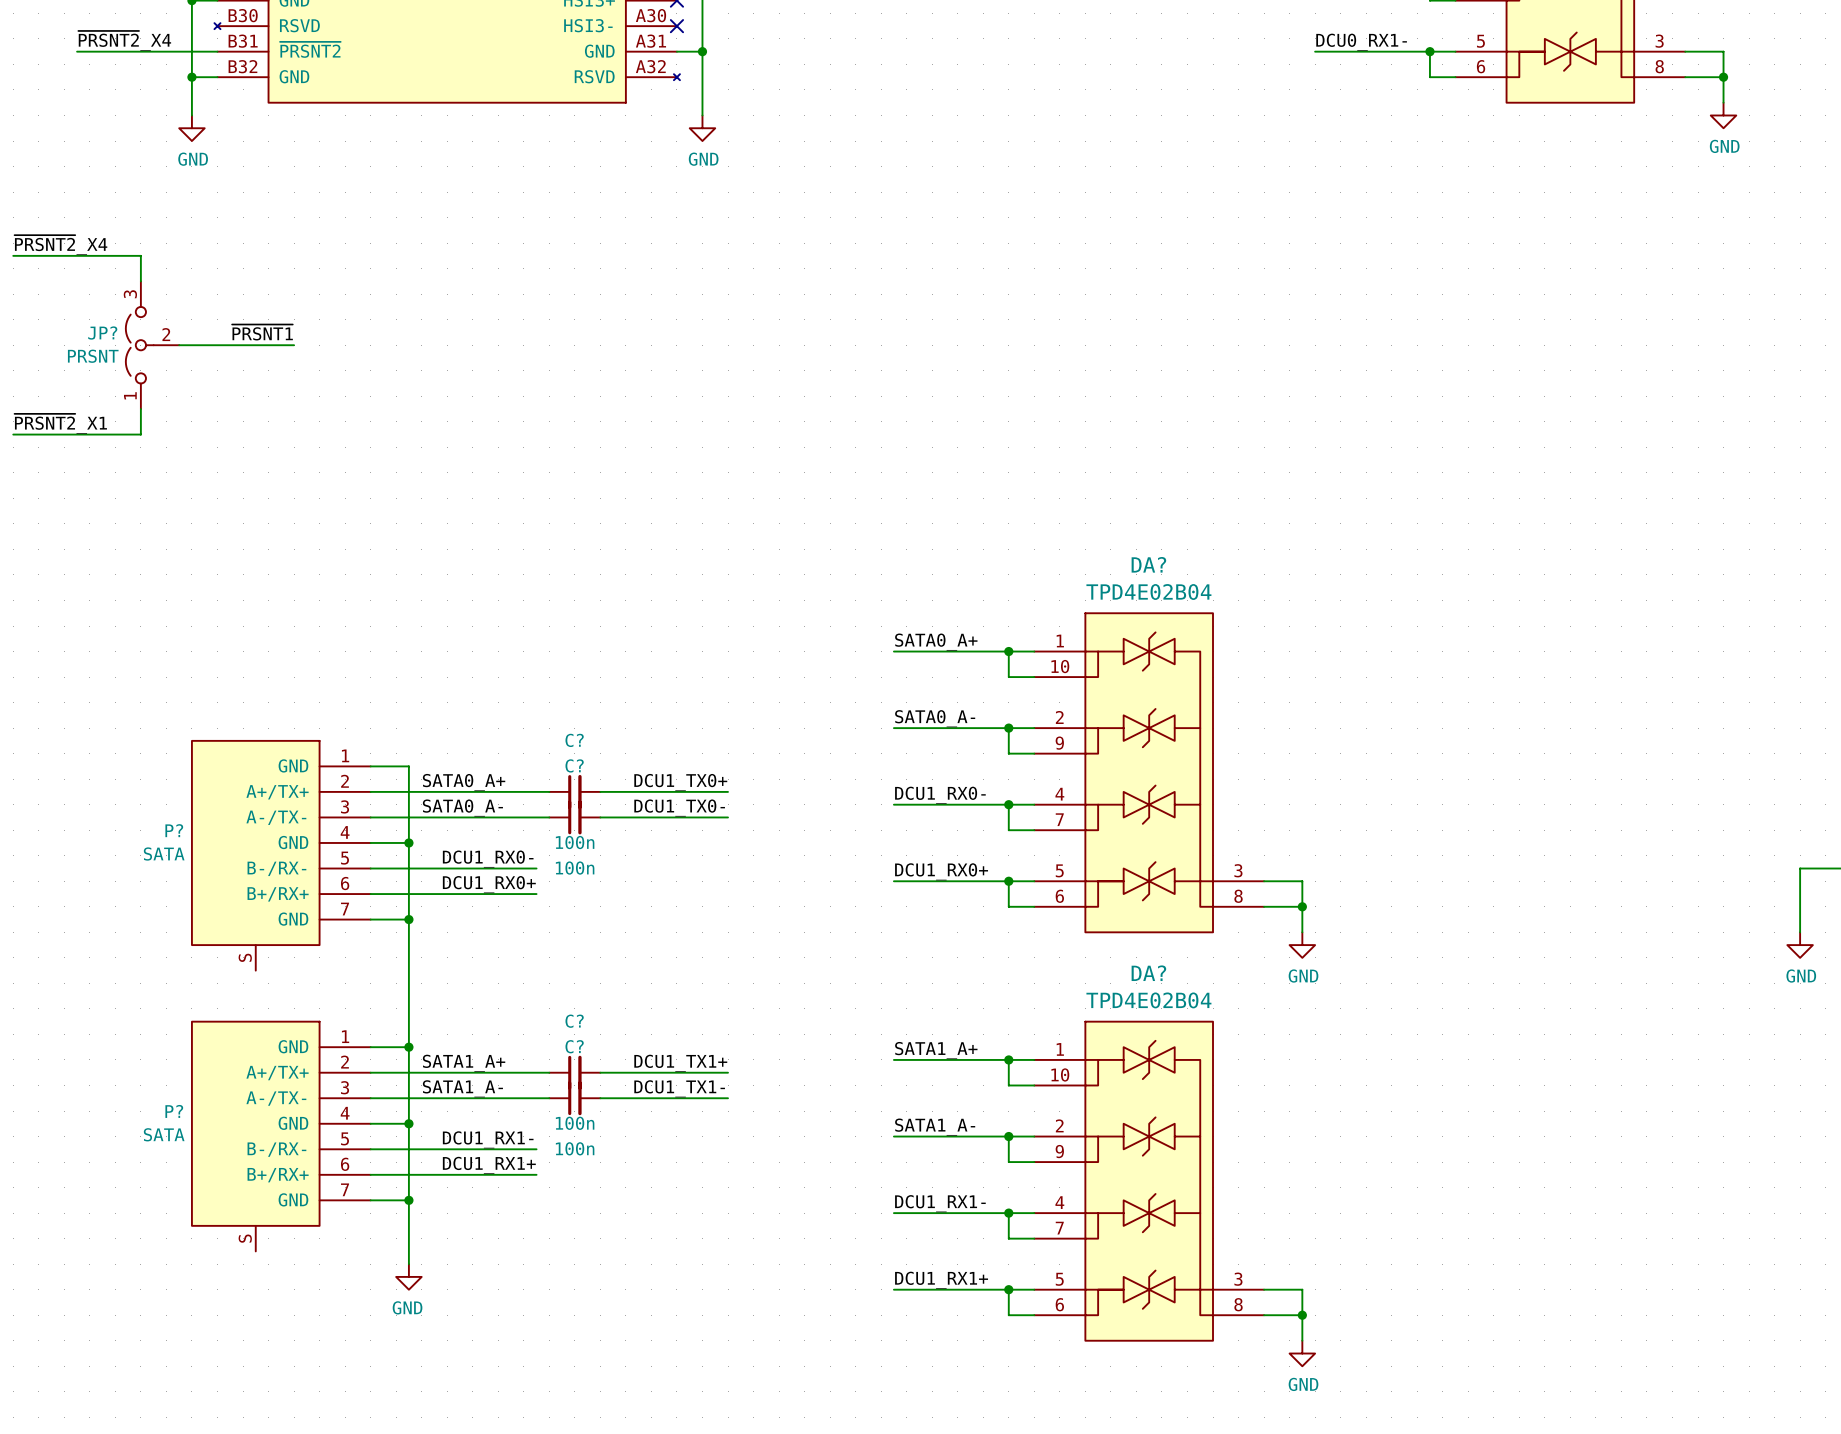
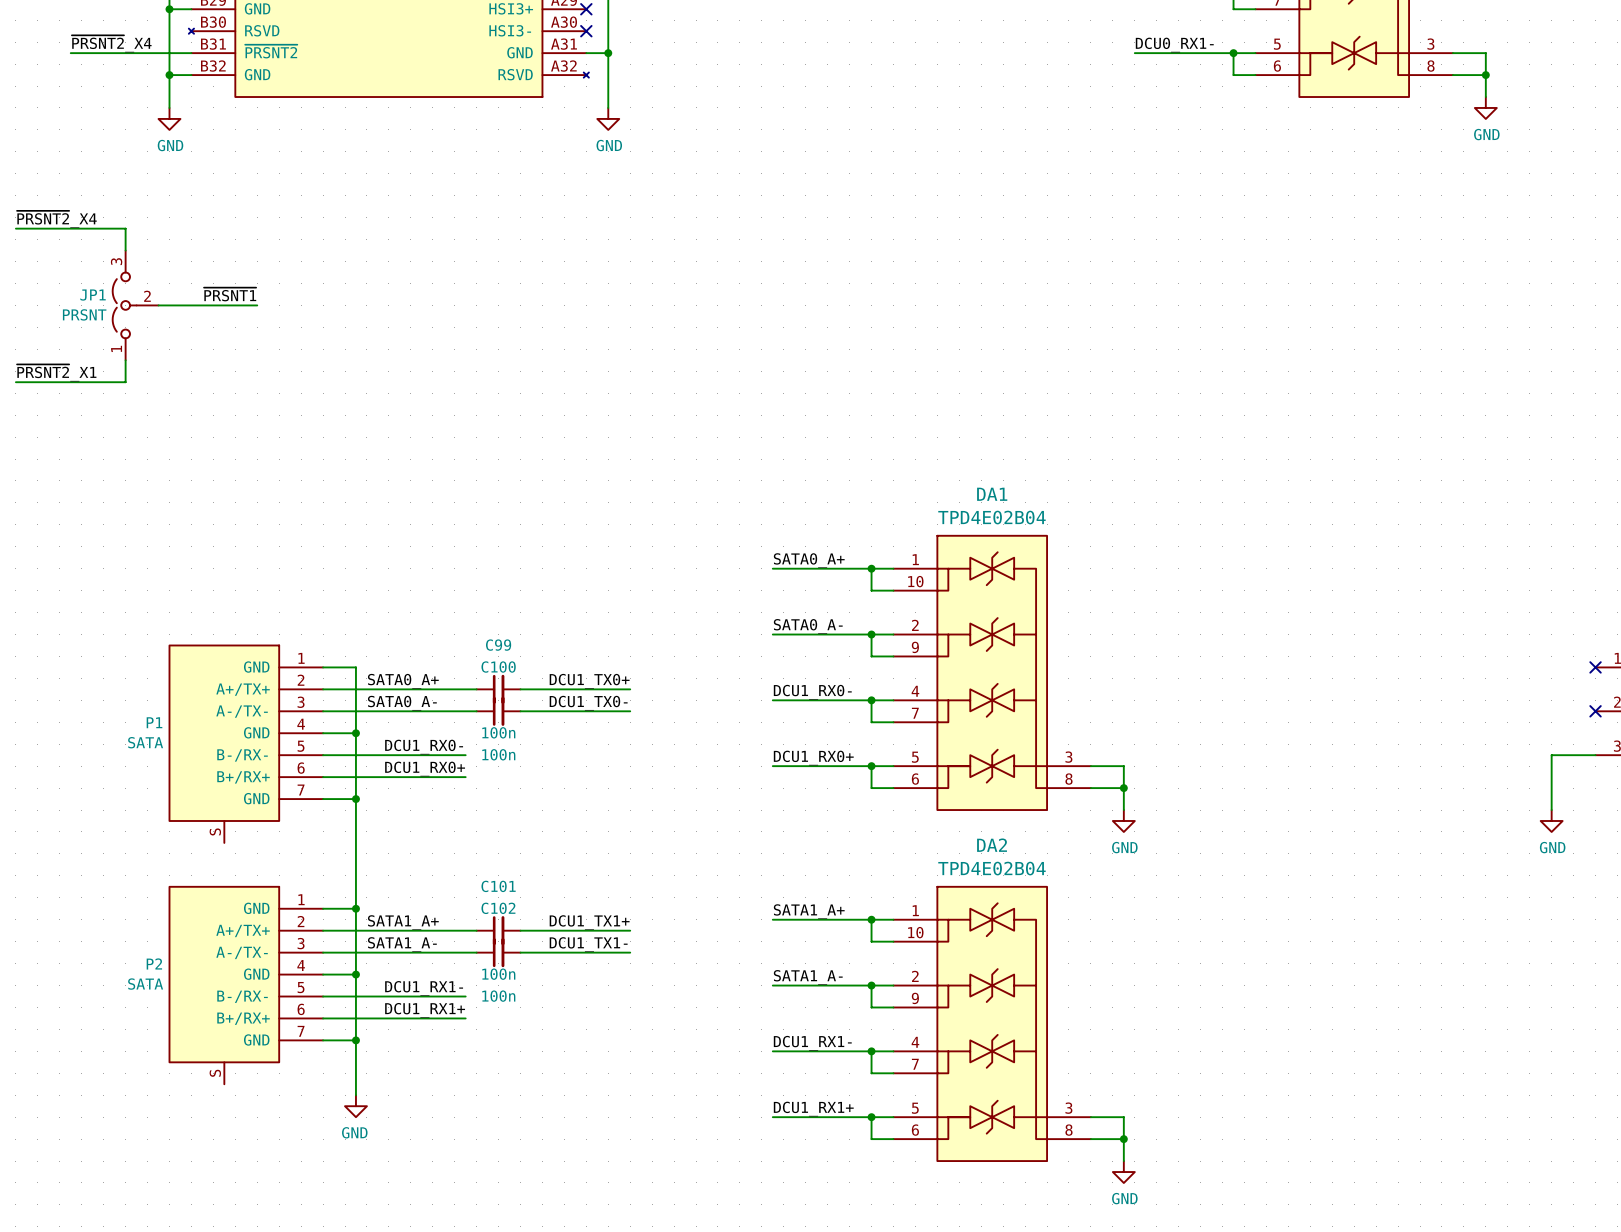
JP? name: JP? (102, 333) -> JP1 (93, 295)
DA? name: DA? (1148, 564) -> DA1 (992, 494)
C? name: C? (574, 740) -> C99 (498, 645)
C? name: C? (574, 765) -> C100 (498, 667)
P? name: P? (174, 830) -> P1 (154, 722)
DA? name: DA? (1148, 973) -> DA2 (992, 845)
C? name: C? (574, 1021) -> C101 (498, 886)
C? name: C? (574, 1046) -> C102 (498, 908)
P? name: P? (174, 1111) -> P2 (154, 963)

